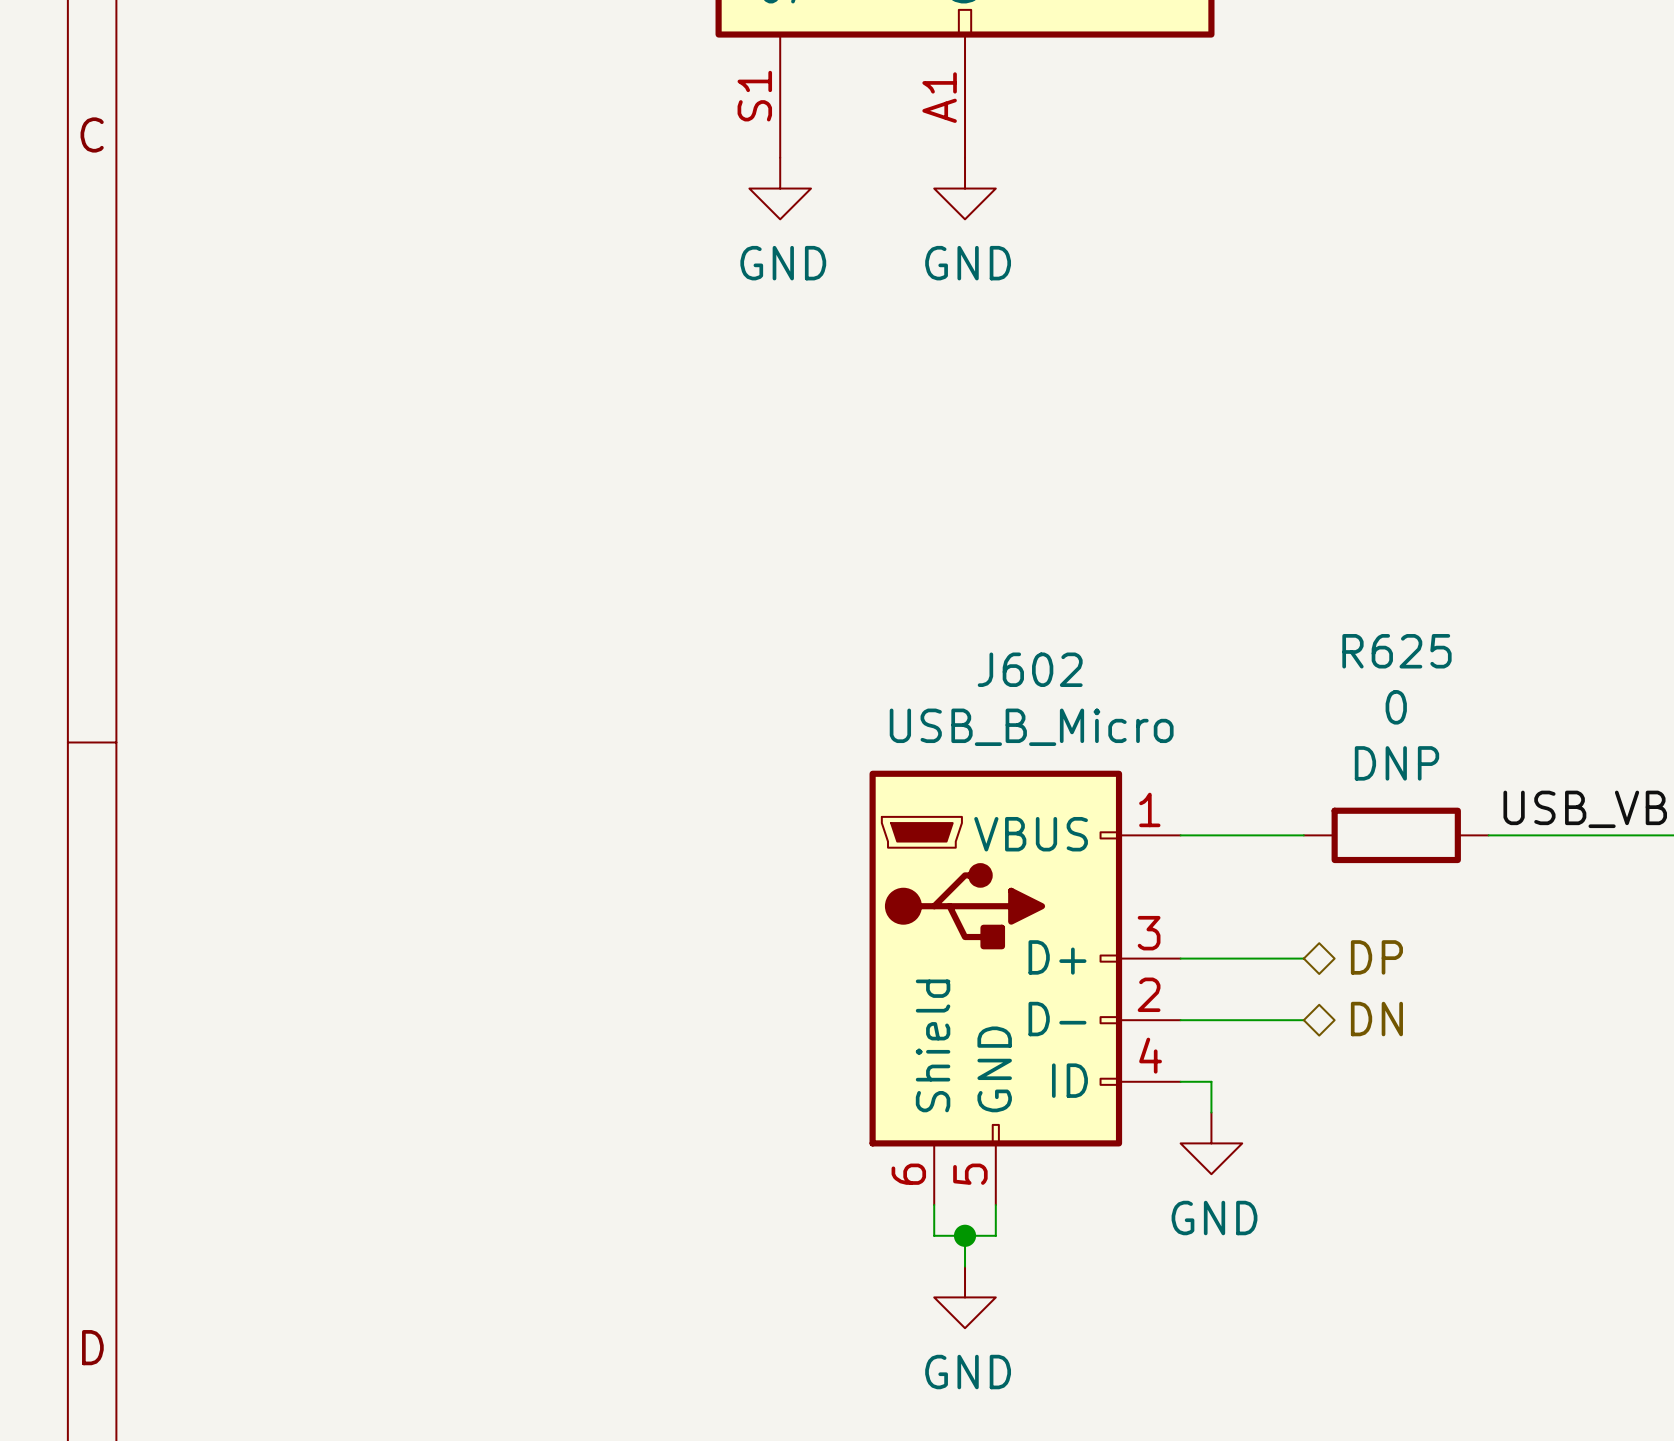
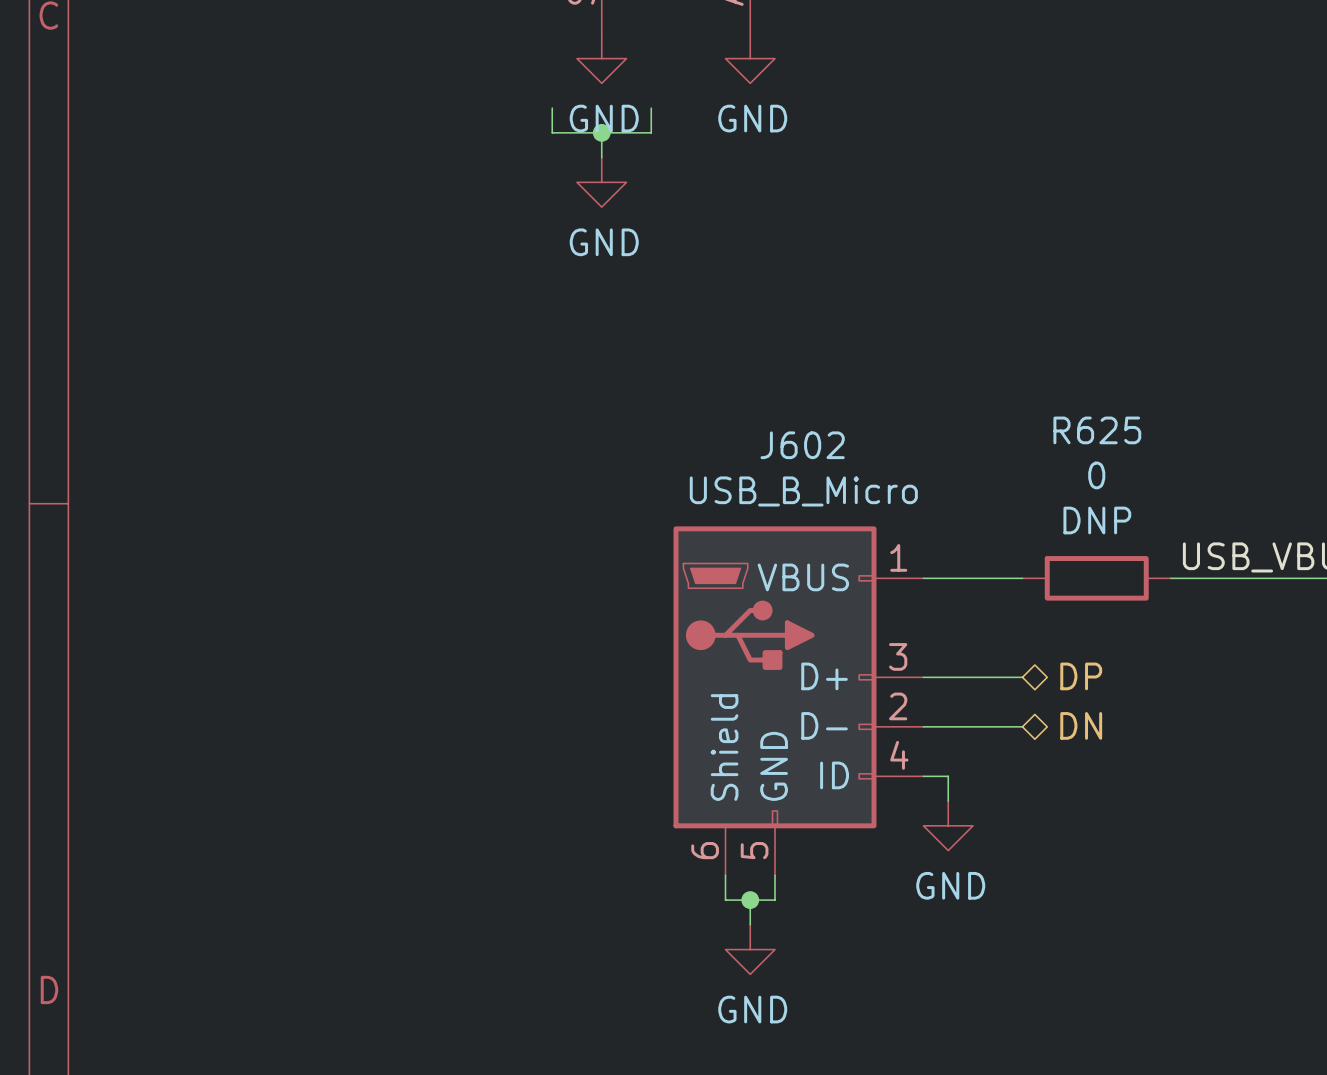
wire: none -> (552, 108) (552, 132) (651, 132) (651, 108)
wire: none -> (601, 132) (601, 157)
junction: none -> (601, 132)
power symbol: none -> GND (601, 182)

